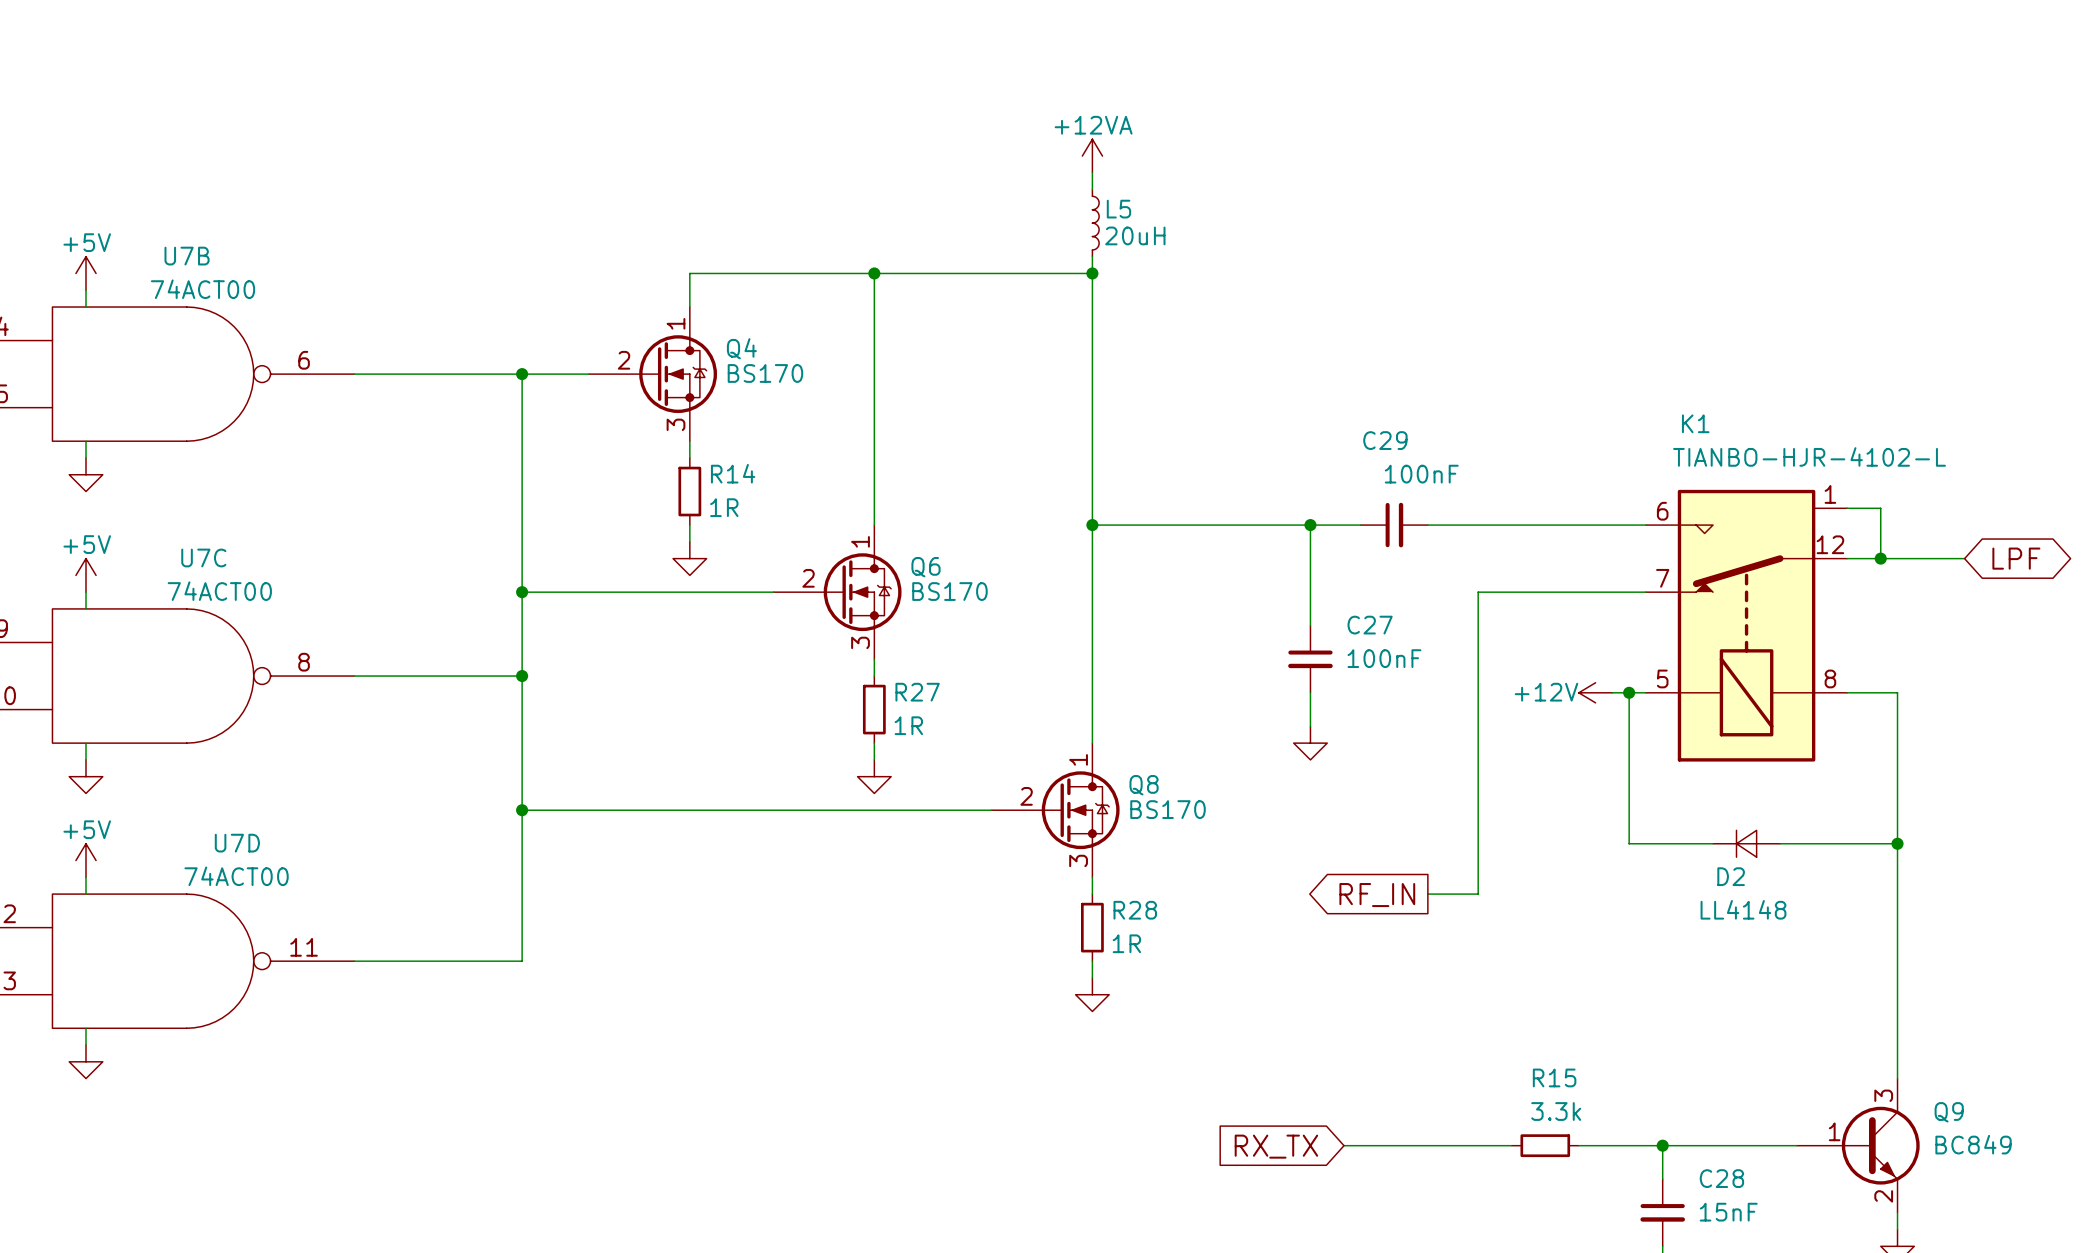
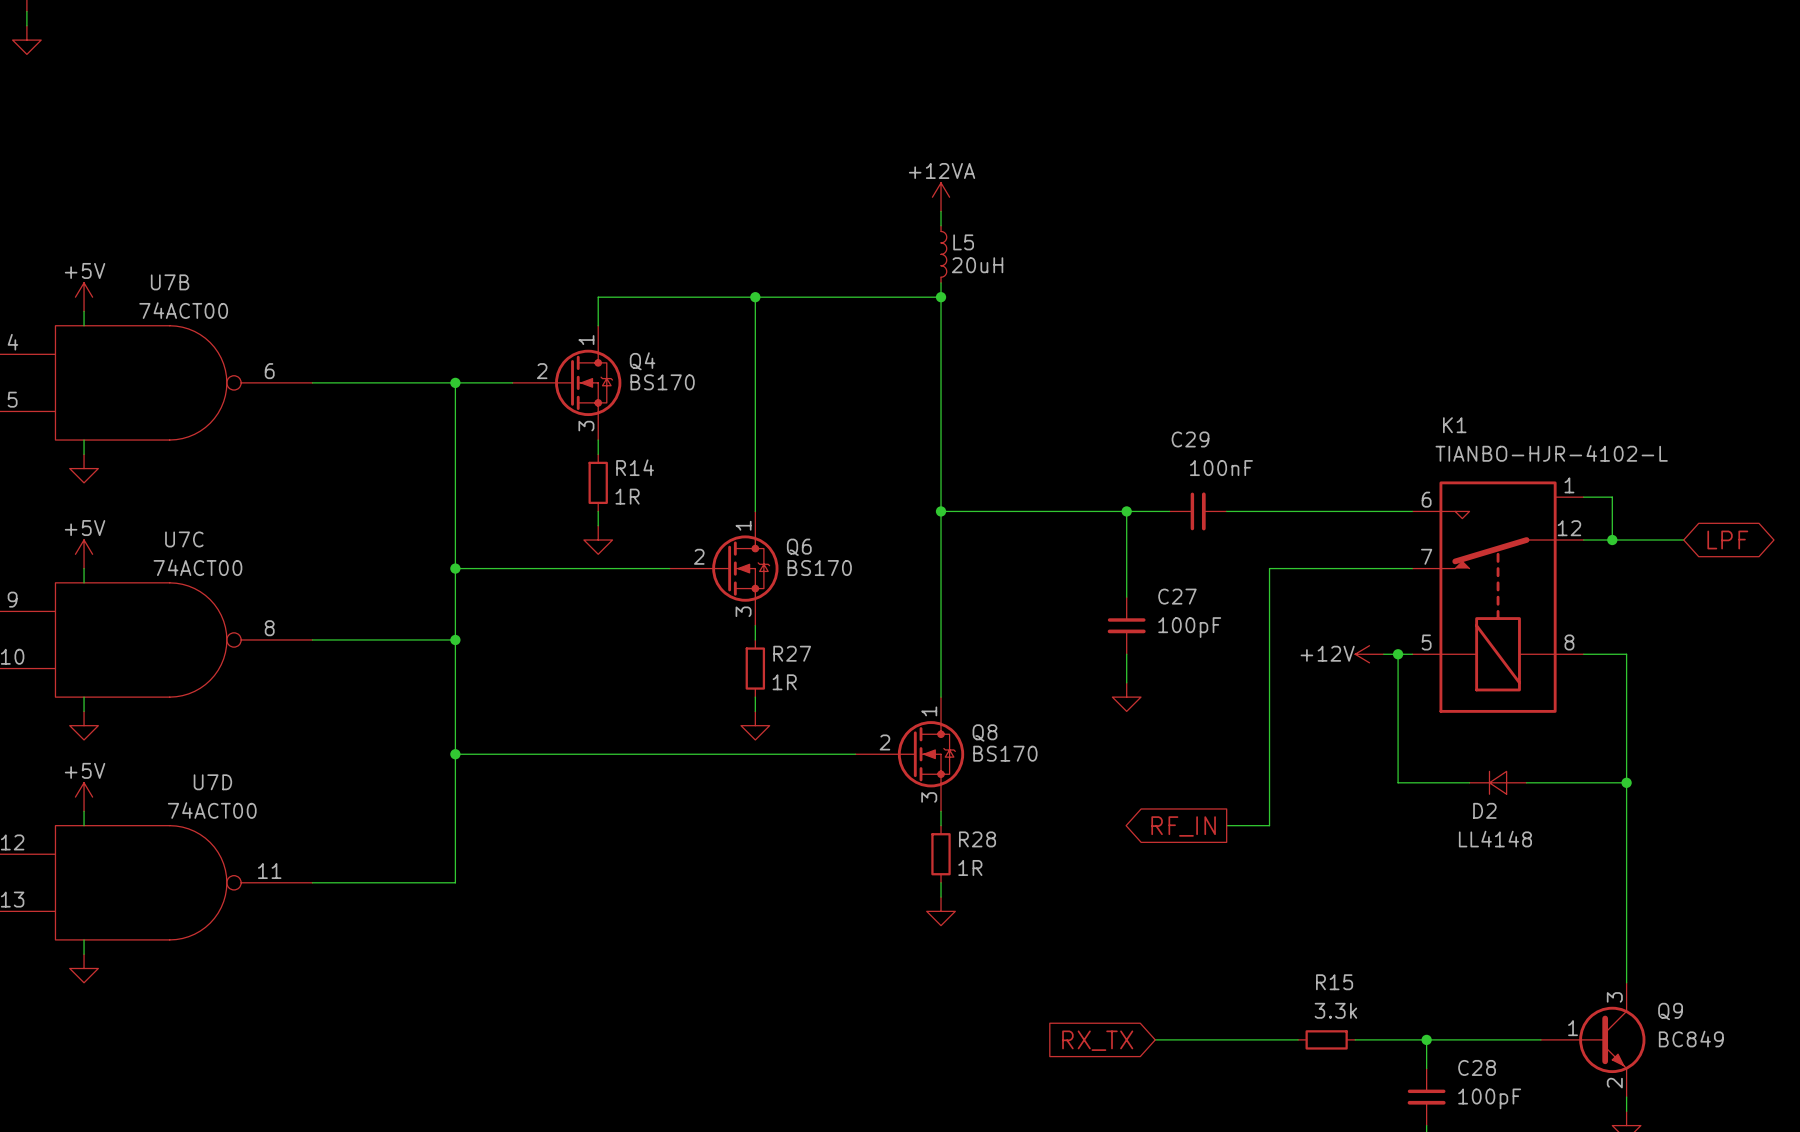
C27 value: 100nF (1384, 658) -> 100pF (1189, 627)
C28 value: 15nF (1728, 1212) -> 100pF (1489, 1098)

